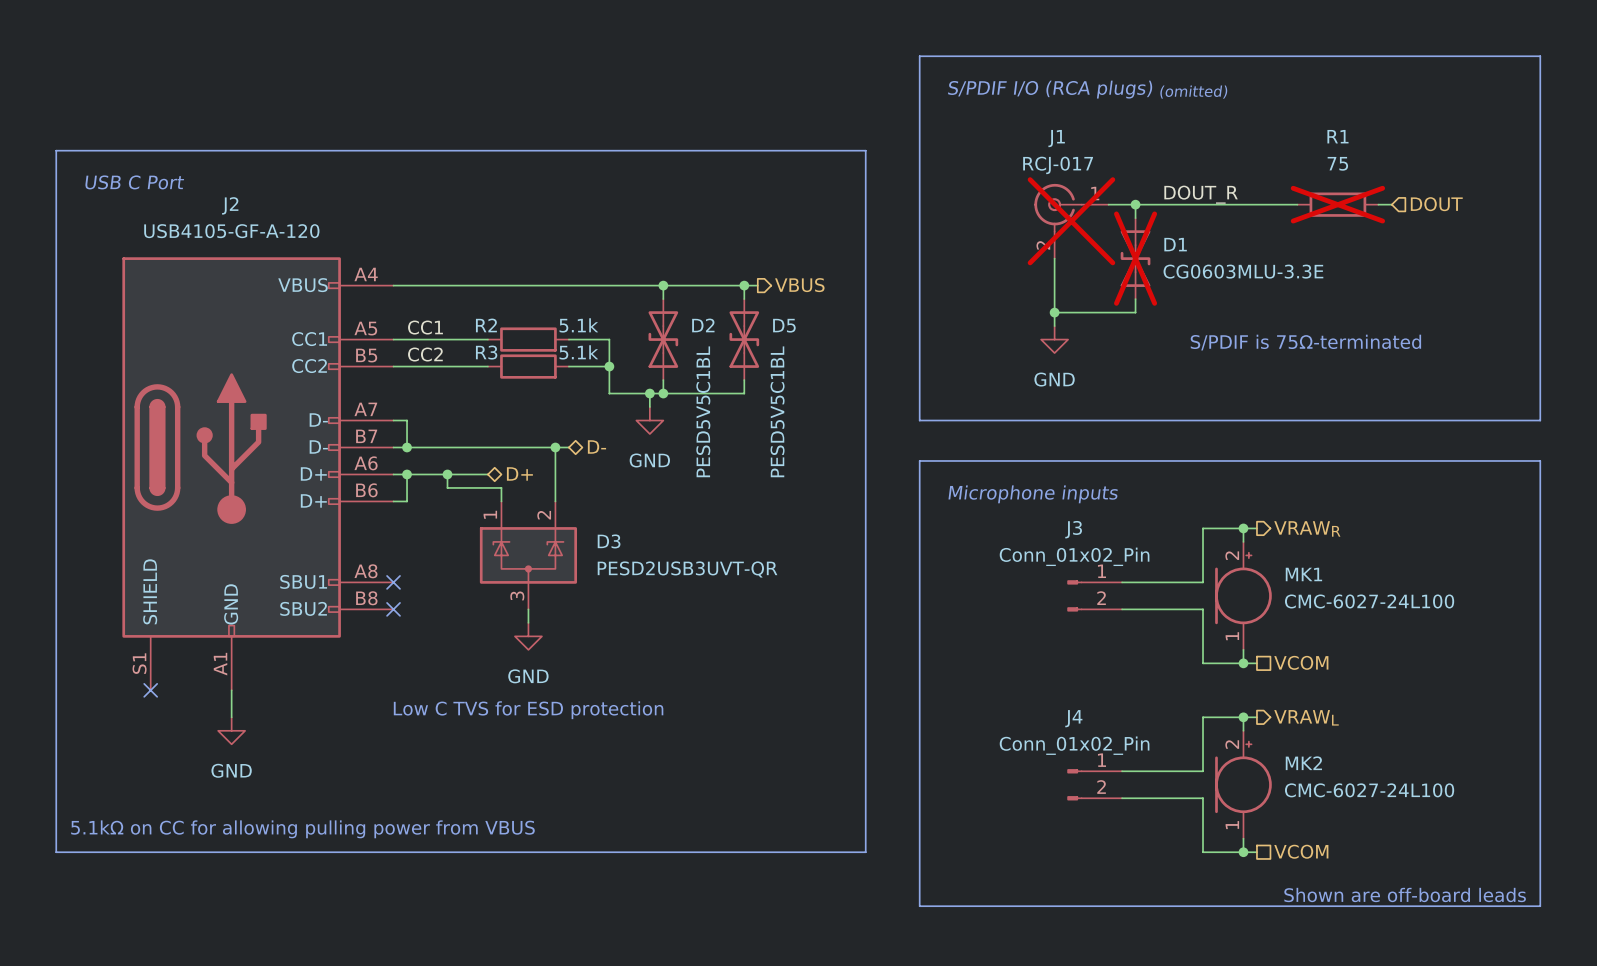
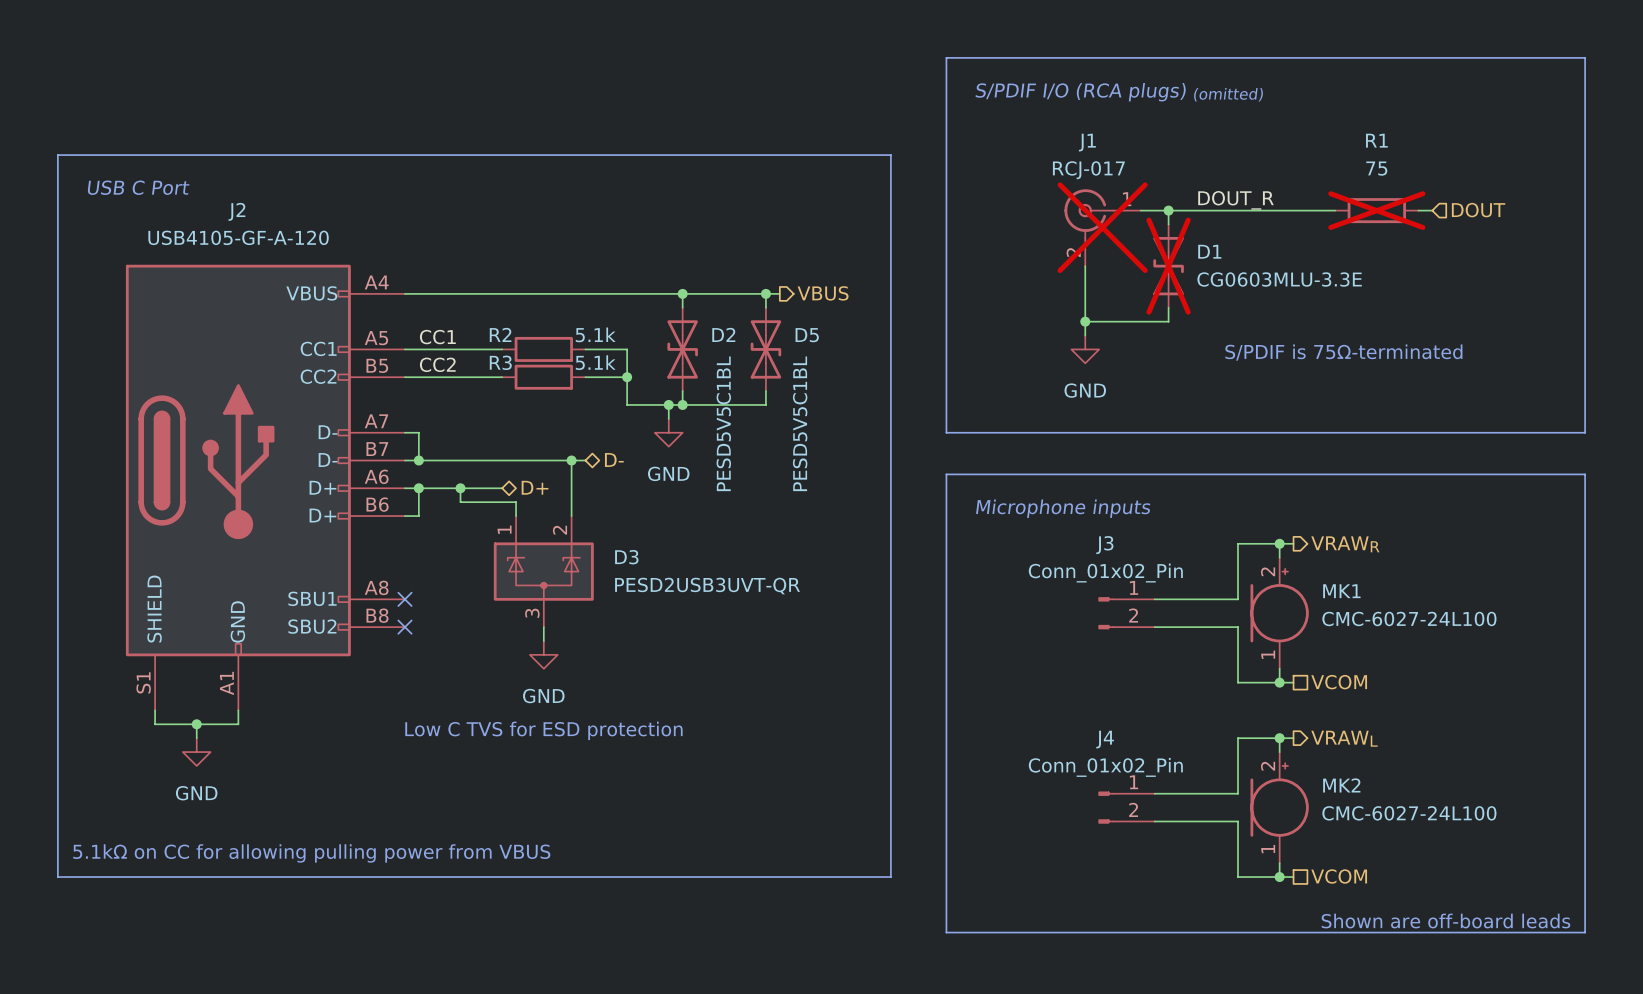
no-connect mark: (150, 690) -> none
wire: none -> (196, 724) (196, 738)
junction: none -> (196, 724)
wire: (231, 703) (231, 717) -> (238, 724) (155, 724) (155, 710)
power symbol position: GND (231, 730) -> GND (196, 752)

